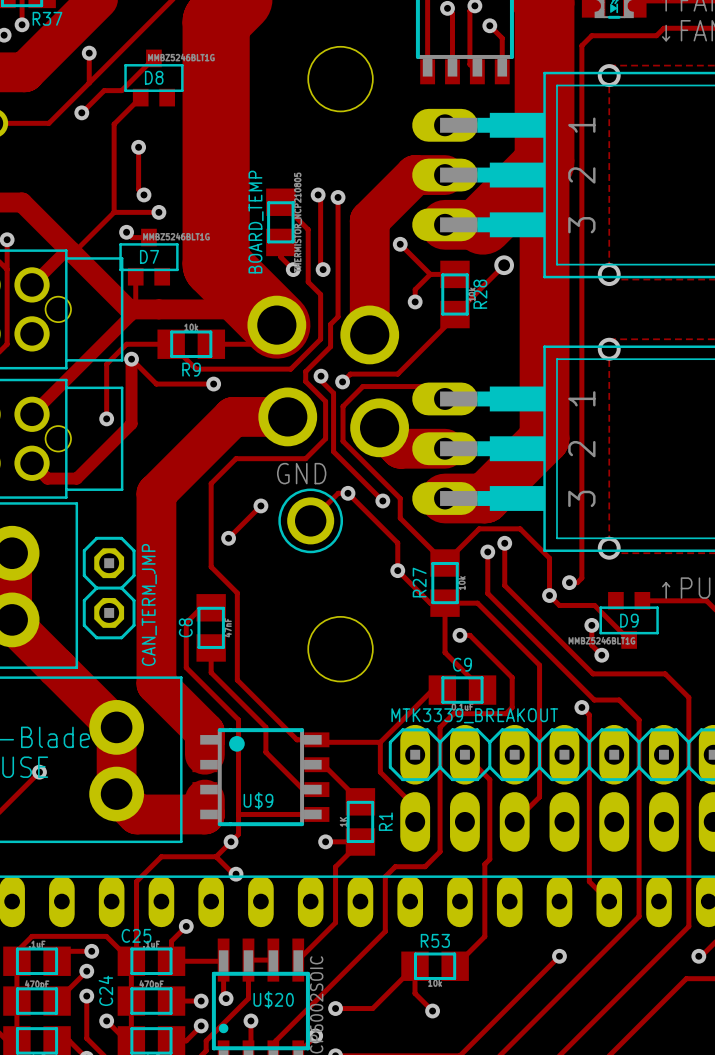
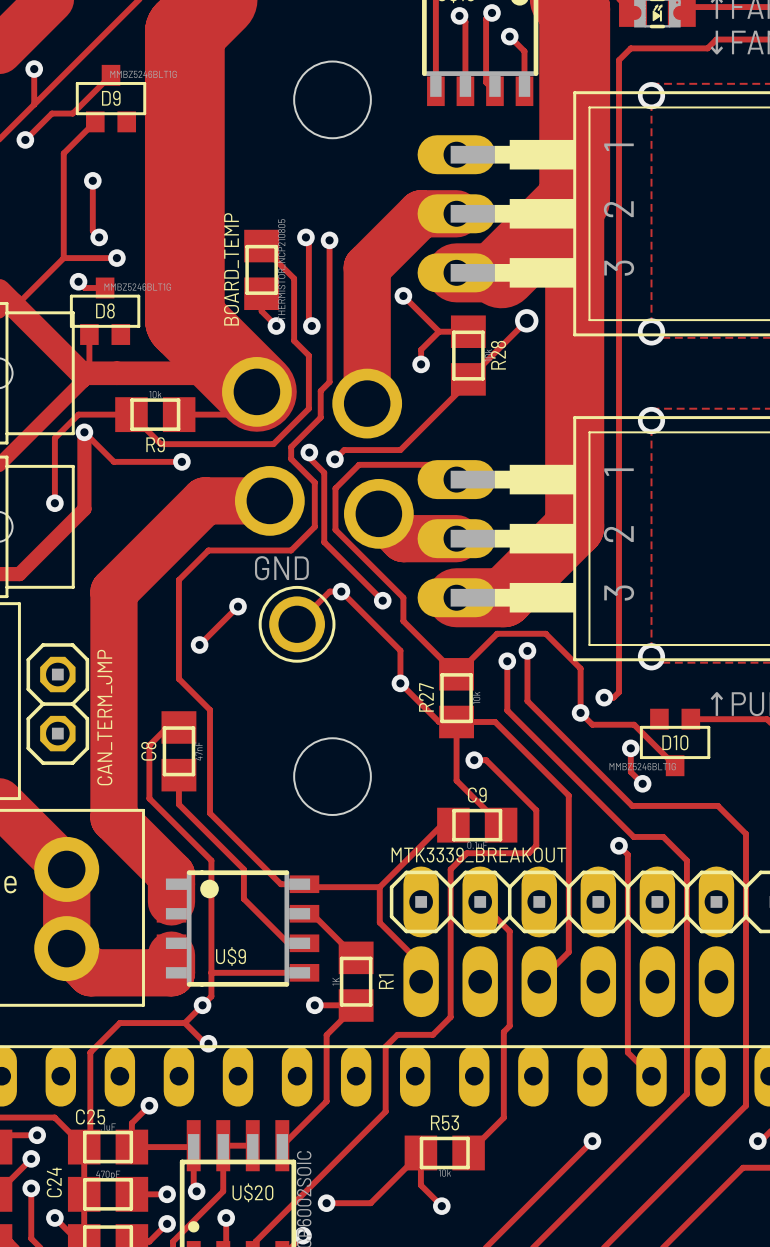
D8 name: D8 (154, 77) -> D9 (111, 98)
D7 name: D7 (149, 256) -> D8 (105, 310)
D9 name: D9 (629, 620) -> D10 (675, 742)

